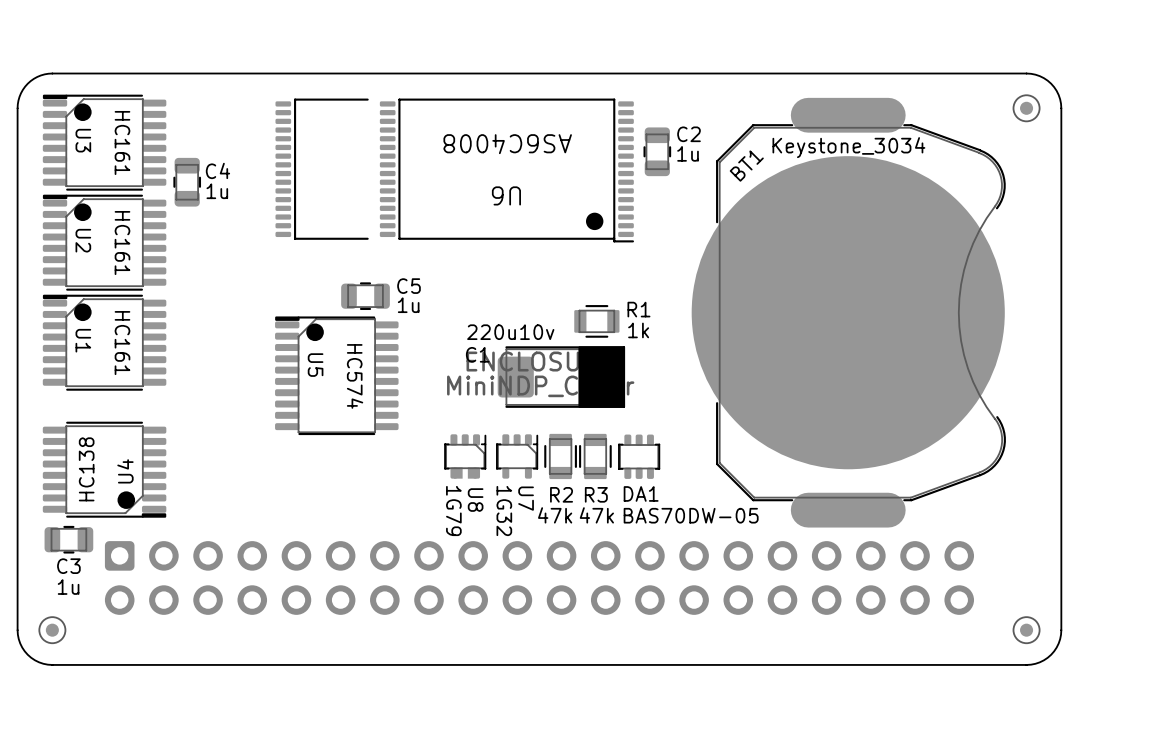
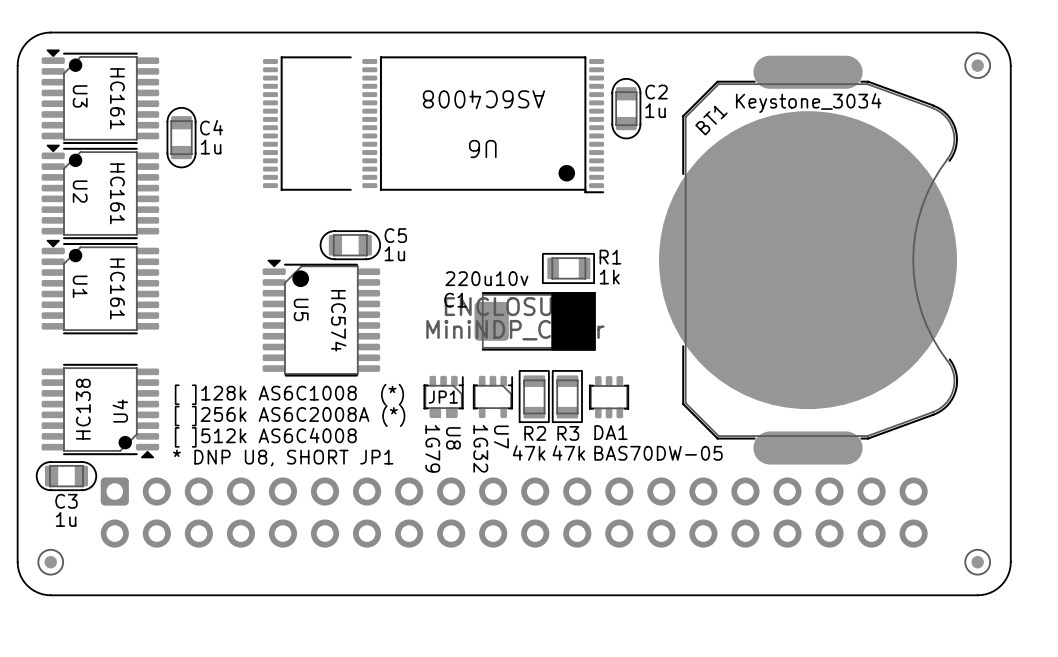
U3 footprint: [42, 94, 167, 191] -> [41, 49, 160, 145]
C2 footprint: [643, 127, 672, 177] -> [611, 78, 642, 140]
C4 footprint: [173, 157, 202, 207] -> [166, 107, 197, 169]
U2 footprint: [42, 194, 167, 291] -> [41, 144, 160, 240]
C5 footprint: [341, 282, 390, 311] -> [319, 230, 381, 261]
U1 footprint: [42, 294, 167, 391] -> [41, 239, 160, 335]
R1 footprint: [574, 305, 620, 338] -> [542, 253, 595, 284]
U5 footprint: [275, 316, 399, 436] -> [262, 259, 381, 377]
U4 footprint: [42, 421, 167, 518] -> [41, 363, 160, 459]
R2 footprint: [544, 433, 577, 480] -> [518, 370, 550, 423]
R3 footprint: [579, 433, 612, 480] -> [551, 370, 583, 423]
text: none -> [ ]128k AS6C1008 (*) (289, 394)
JP1 name: none -> JP1 (443, 397)
text: none -> [ ]256k AS6C2008A (*) (290, 416)
text: none -> [ ]512k AS6C4008 (265, 437)
text: none -> * DNP U8, SHORT JP1 (283, 458)
C3 footprint: [44, 525, 94, 554] -> [35, 461, 98, 492]

